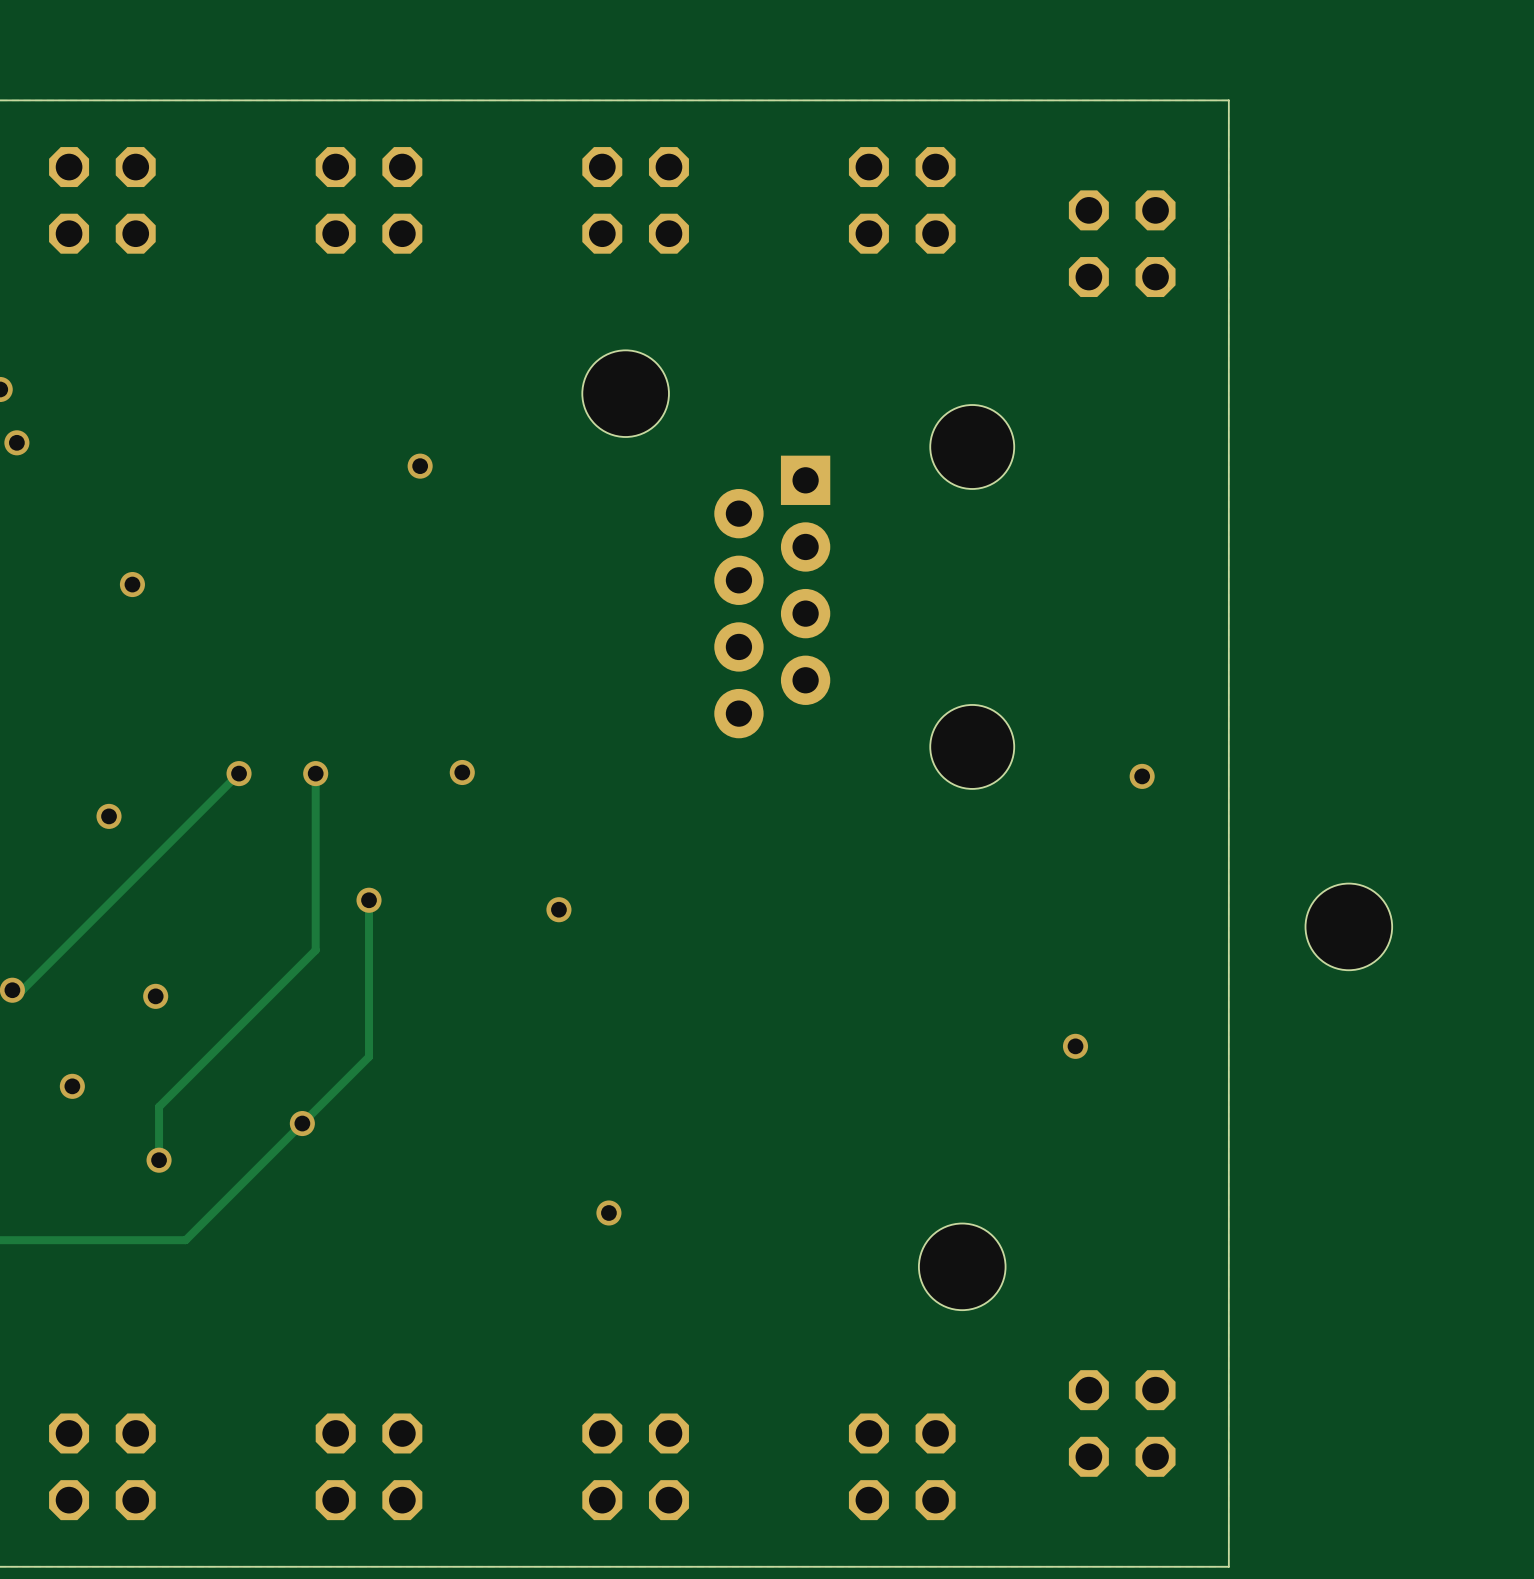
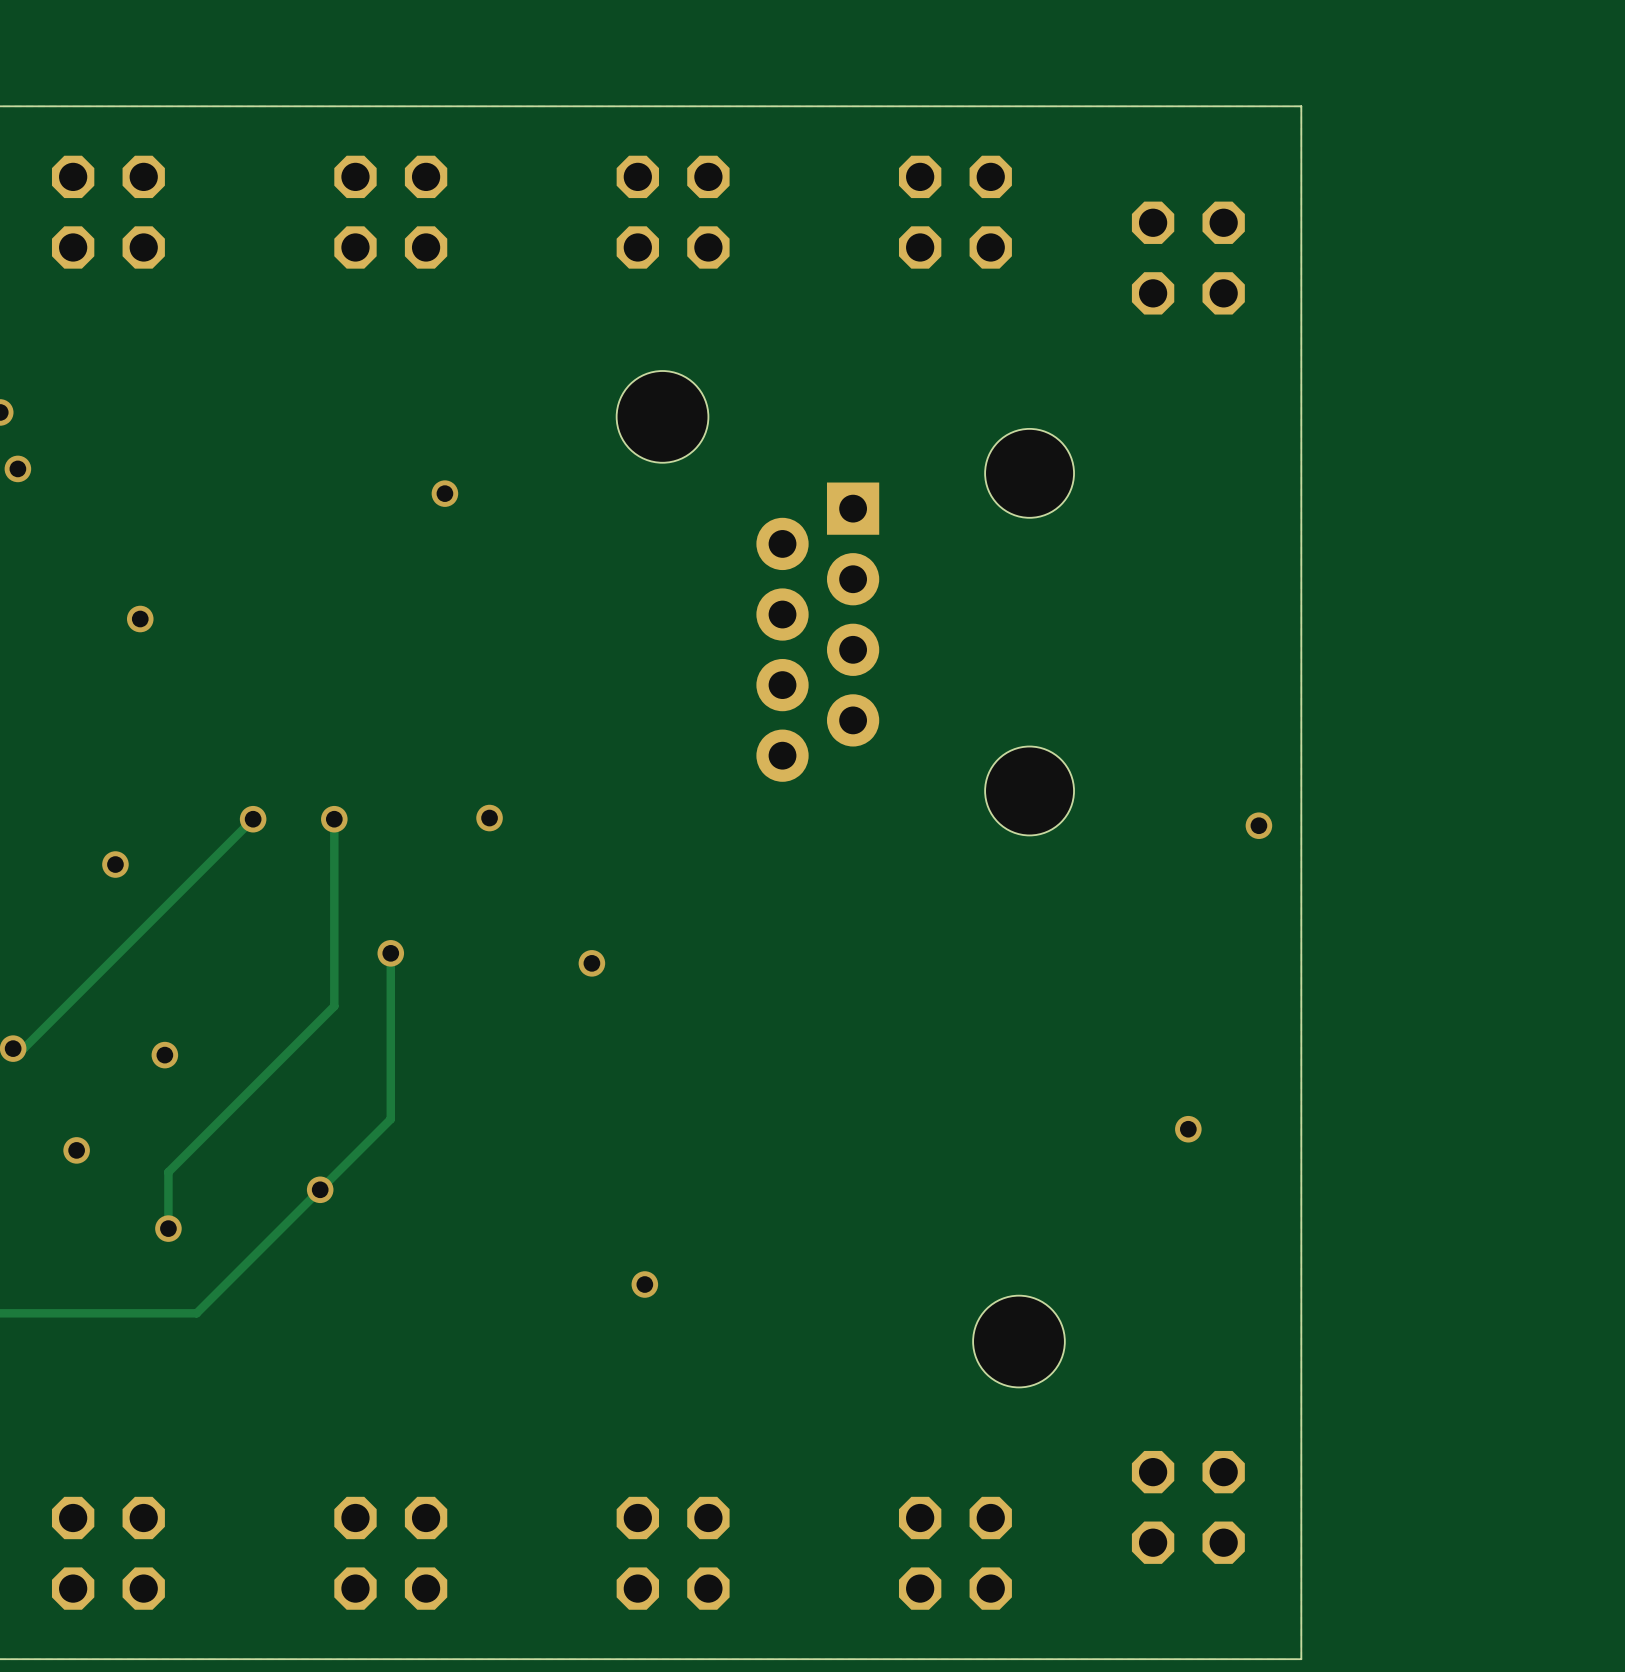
via position: (1142, 776) -> (1258, 825)
part: (1348, 926) -> none
via position: (1075, 1046) -> (1188, 1129)

